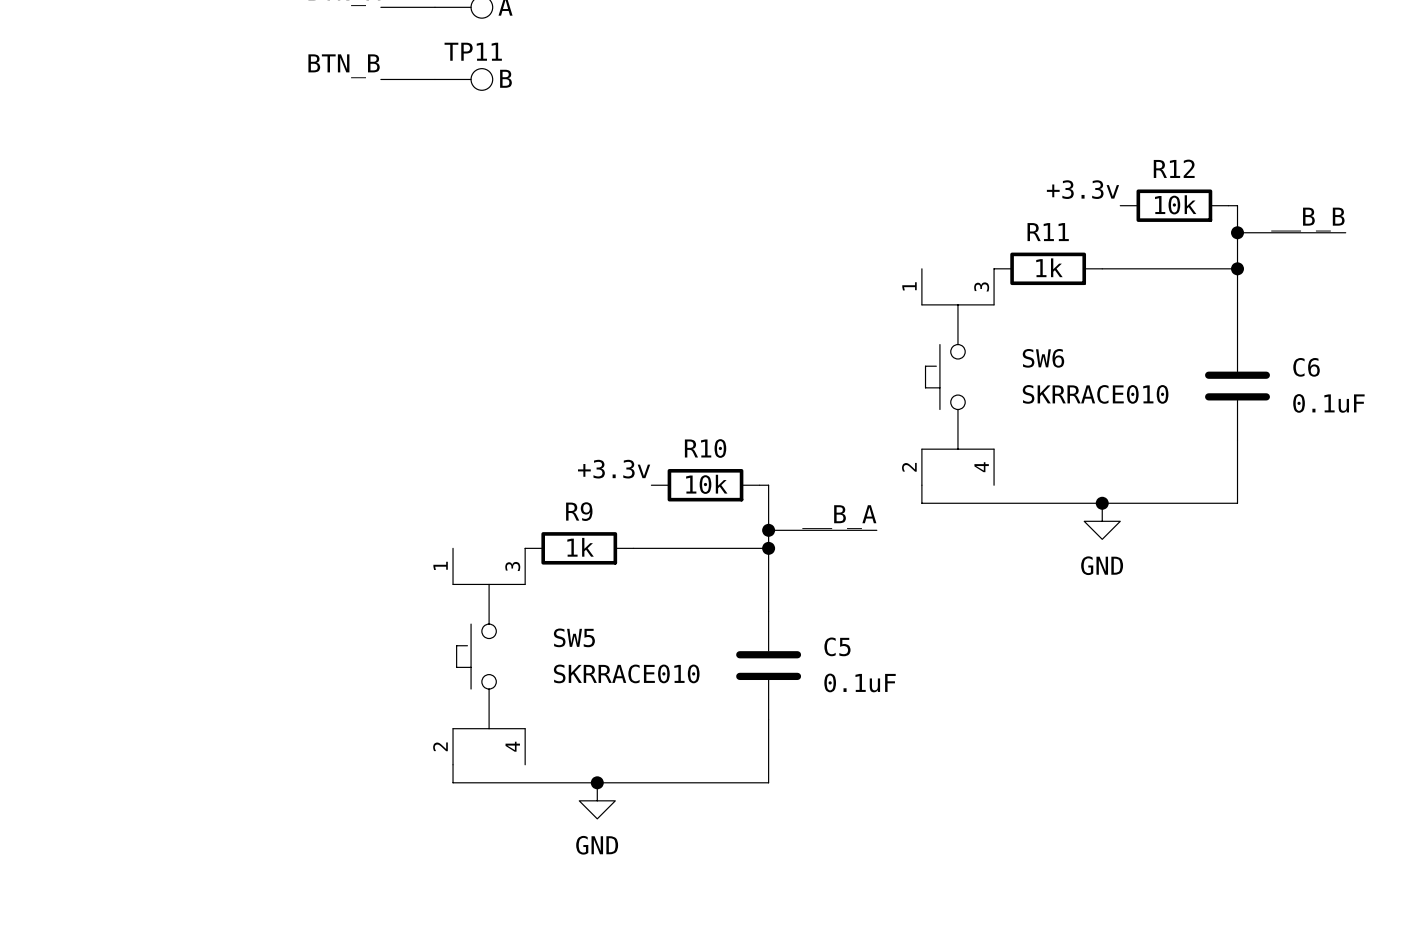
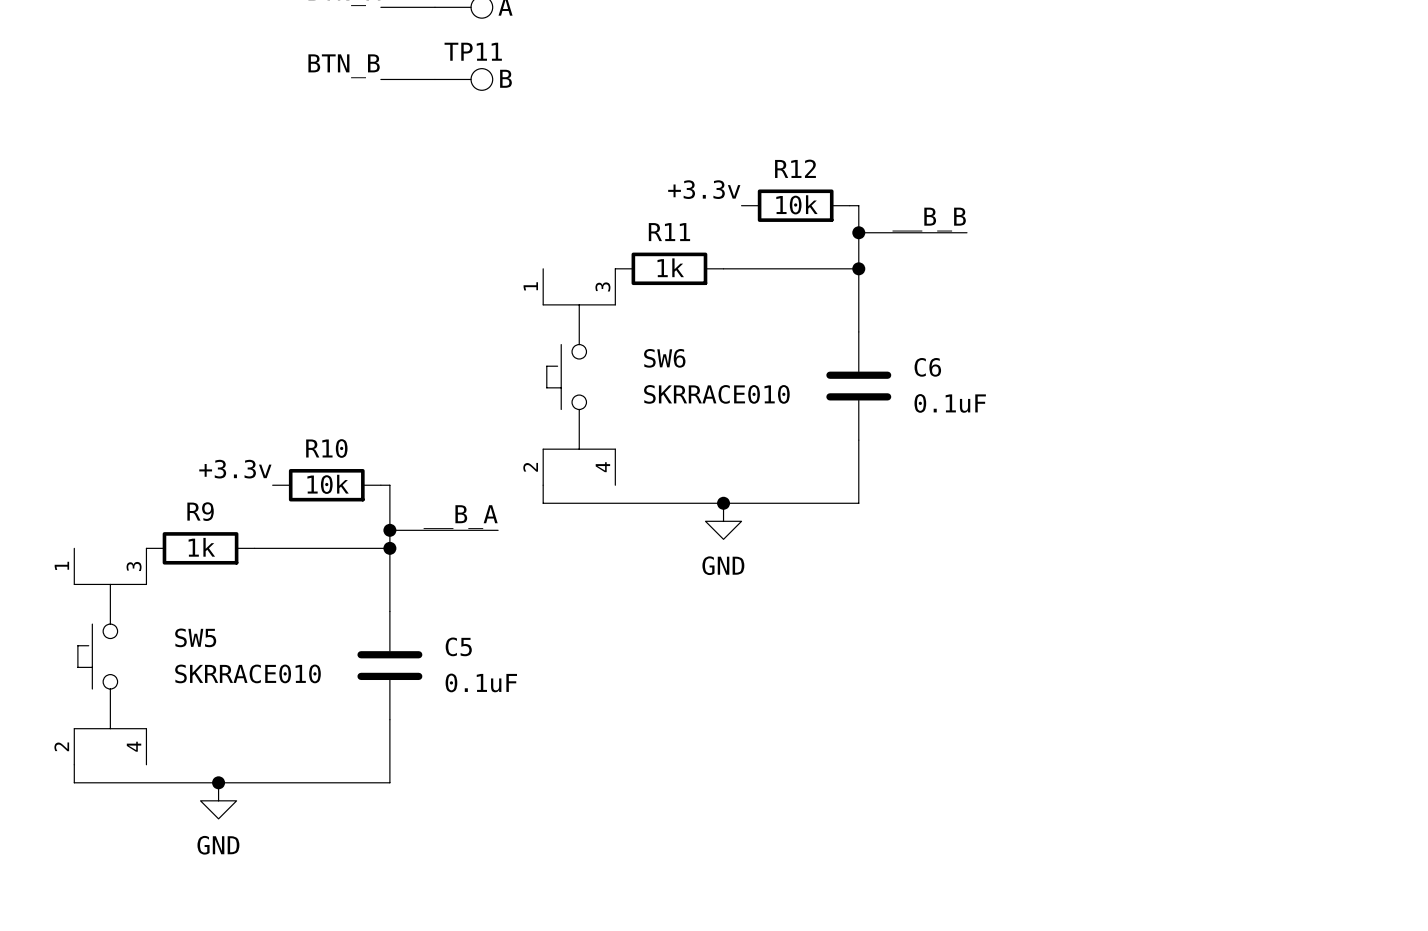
label: none -> +3.3v (704, 189)
label: +3.3v (1082, 189) -> none
R12 position: (1174, 205) -> (795, 205)
wire: (1228, 205) (1237, 205) (1237, 331) -> none
label: none -> __B_B (929, 219)
label: __B_B (1307, 219) -> none
junction: none -> (858, 232)
wire: (1237, 232) (1345, 232) -> none
junction: (1237, 232) -> none
junction: none -> (858, 268)
R11 position: (1048, 268) -> (669, 268)
wire: (1102, 268) (1237, 268) -> none
junction: (1237, 268) -> none
SW6 position: (957, 377) -> (579, 377)
C6 position: (1237, 386) -> (858, 386)
wire: (1237, 440) (1237, 503) (921, 503) (921, 485) -> none
label: none -> +3.3v (235, 469)
label: +3.3v (614, 469) -> none
wire: none -> (380, 485) (389, 485) (389, 611)
R10 position: (705, 485) -> (326, 485)
wire: (759, 485) (768, 485) (768, 611) -> (849, 205) (858, 205) (858, 331)
junction: none -> (723, 503)
junction: (1102, 503) -> none
label: none -> __B_A (460, 517)
label: __B_A (839, 517) -> none
power symbol: none -> GND (723, 521)
power symbol: GND (1102, 521) -> none
wire: none -> (389, 530) (498, 530)
junction: none -> (389, 530)
wire: (768, 530) (876, 530) -> (858, 232) (966, 232)
junction: (768, 530) -> none
wire: none -> (254, 548) (389, 548)
junction: none -> (389, 548)
R9 position: (579, 548) -> (200, 548)
wire: (633, 548) (768, 548) -> (723, 268) (858, 268)
junction: (768, 548) -> none
SW5 position: (489, 656) -> (110, 656)
C5 position: (768, 665) -> (389, 665)
wire: none -> (389, 719) (389, 782) (74, 782) (74, 764)
wire: (768, 719) (768, 782) (453, 782) (453, 764) -> (858, 440) (858, 503) (543, 503) (543, 485)
junction: none -> (218, 782)
junction: (597, 782) -> none
power symbol: none -> GND (218, 800)
power symbol: GND (597, 800) -> none

